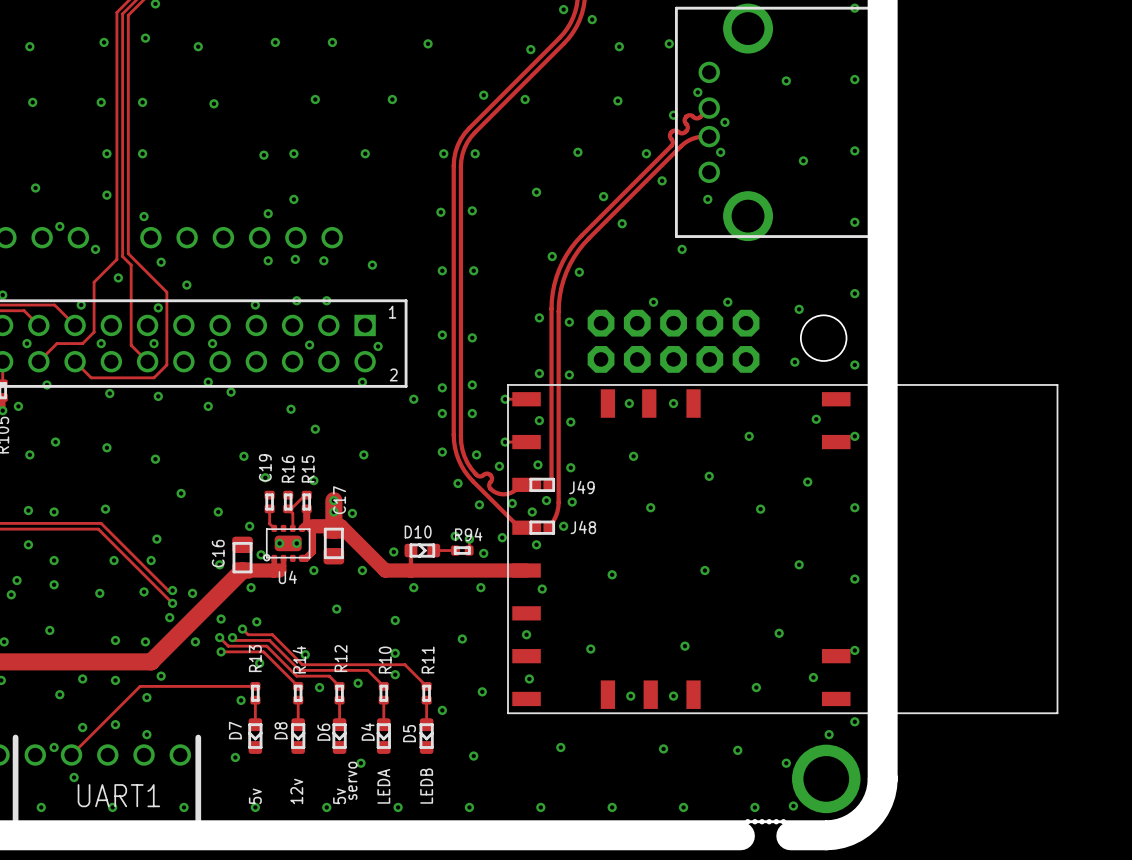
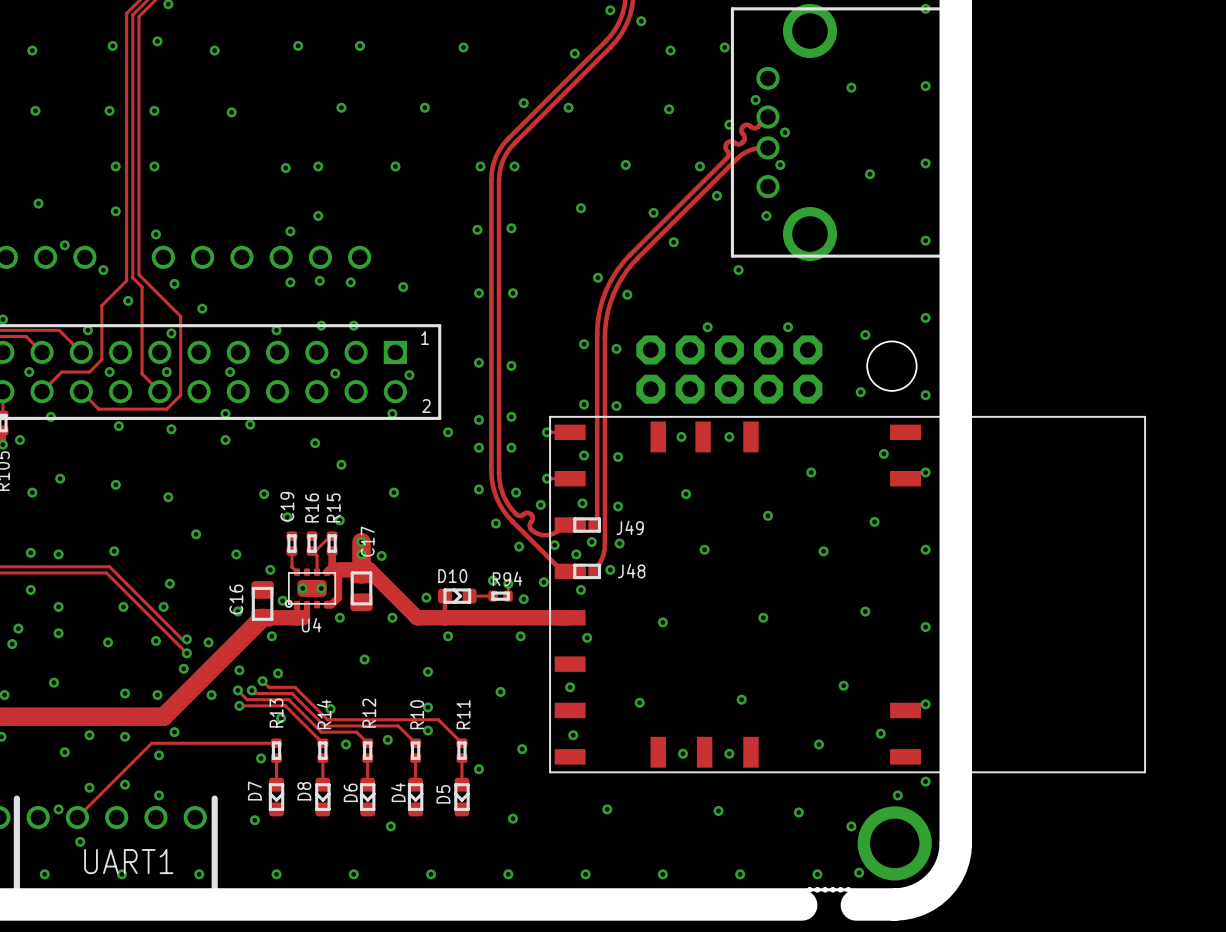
text: servo (352, 780) -> none
text: LEDA (383, 786) -> none
text: LEDB (426, 786) -> none
text: 12v (296, 791) -> none
text: 5v (255, 796) -> none
text: 5v (339, 796) -> none

